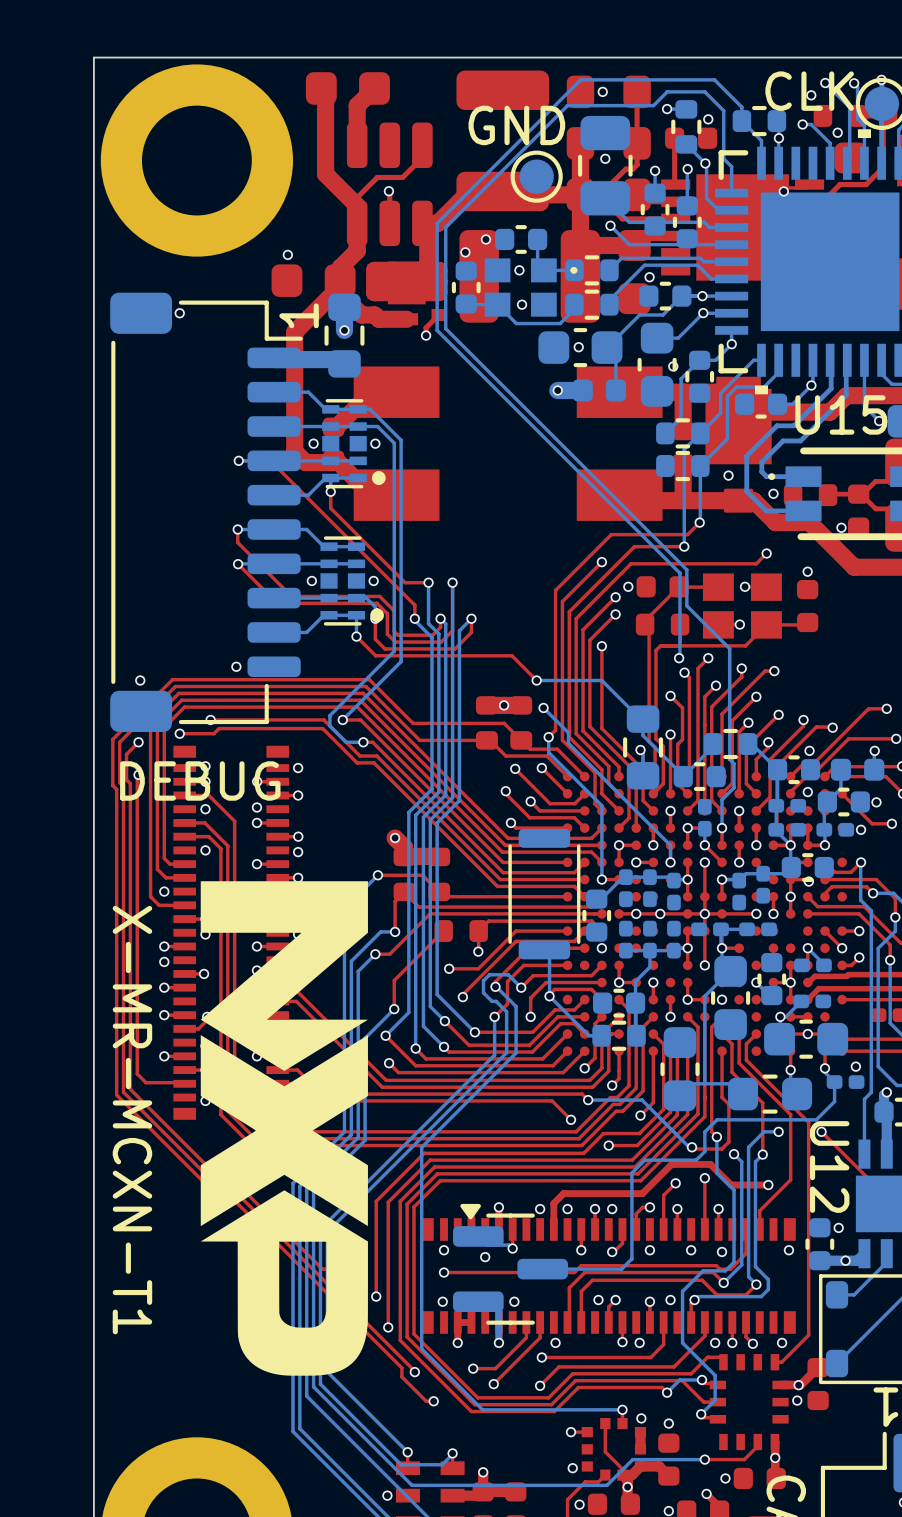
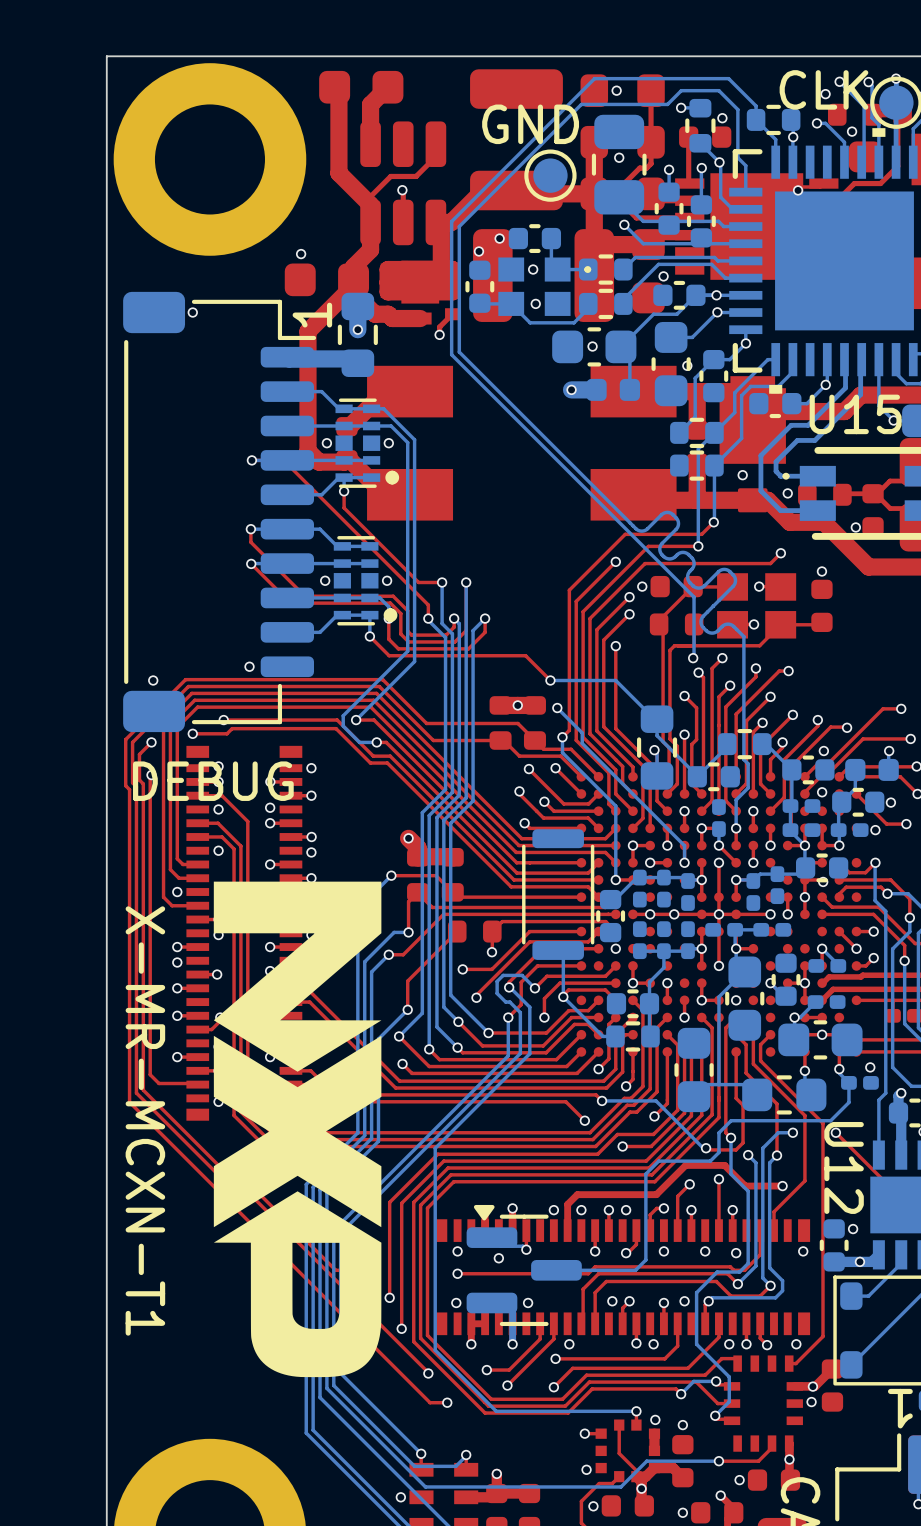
bottom track: (438, 222) (437, 330) (679, 573) (679, 597) -> (451, 221) (451, 354) (694, 597)
bottom track: (445, 328) (686, 569) (686, 605) (729, 648) -> (459, 327) (459, 352) (636, 529) (645, 530) (664, 512) (670, 513) (676, 517) (678, 522) (677, 527) (661, 544) (660, 551) (667, 558) (673, 558) (682, 552) (691, 557) (693, 565) (687, 576) (692, 585) (696, 587) (702, 587) (722, 569) (727, 570) (733, 575) (735, 580) (734, 584) (702, 616) (701, 623) (706, 630) (711, 633) (716, 632) (724, 624) (732, 625) (743, 636) (743, 648)
top track: (116, 1095) (216, 1195) (229, 1195) (401, 1368) (401, 1376) (426, 1401) -> (129, 1095) (129, 1102) (430, 1402) (439, 1402)

